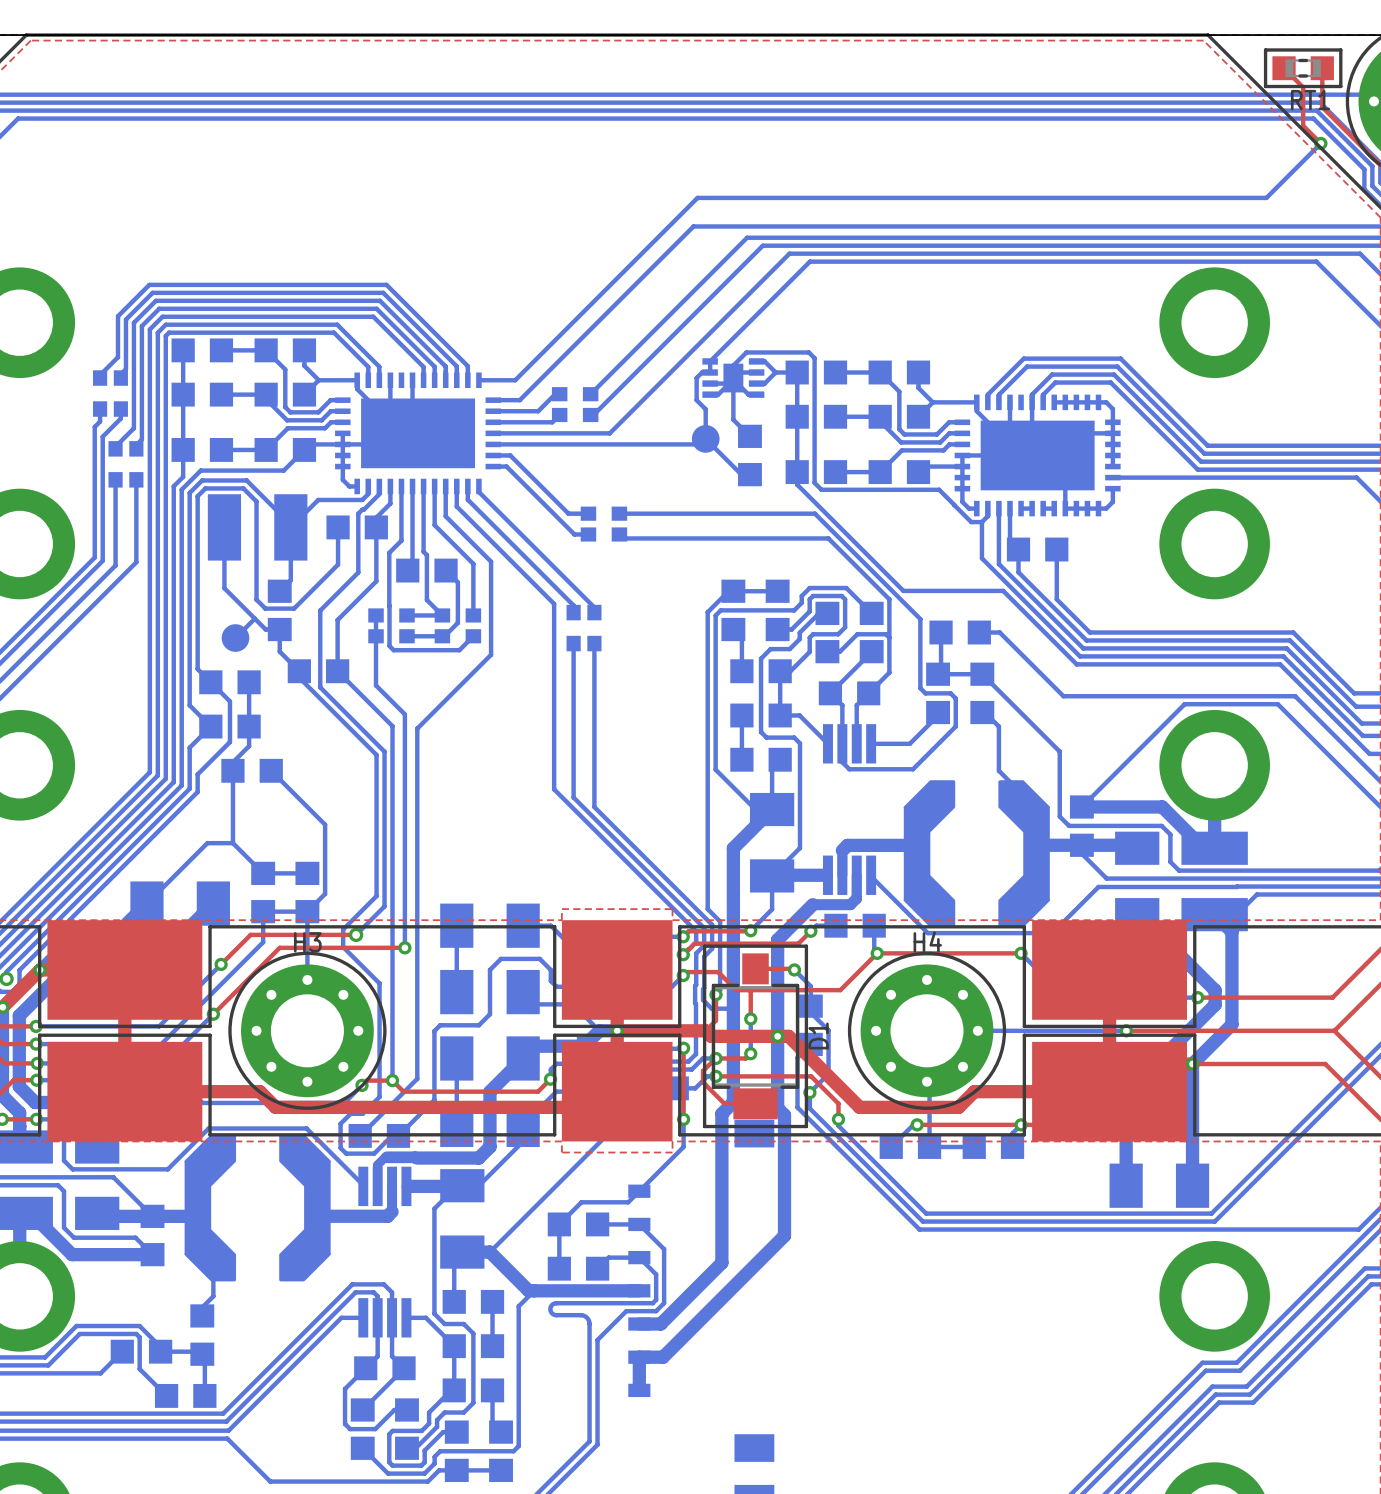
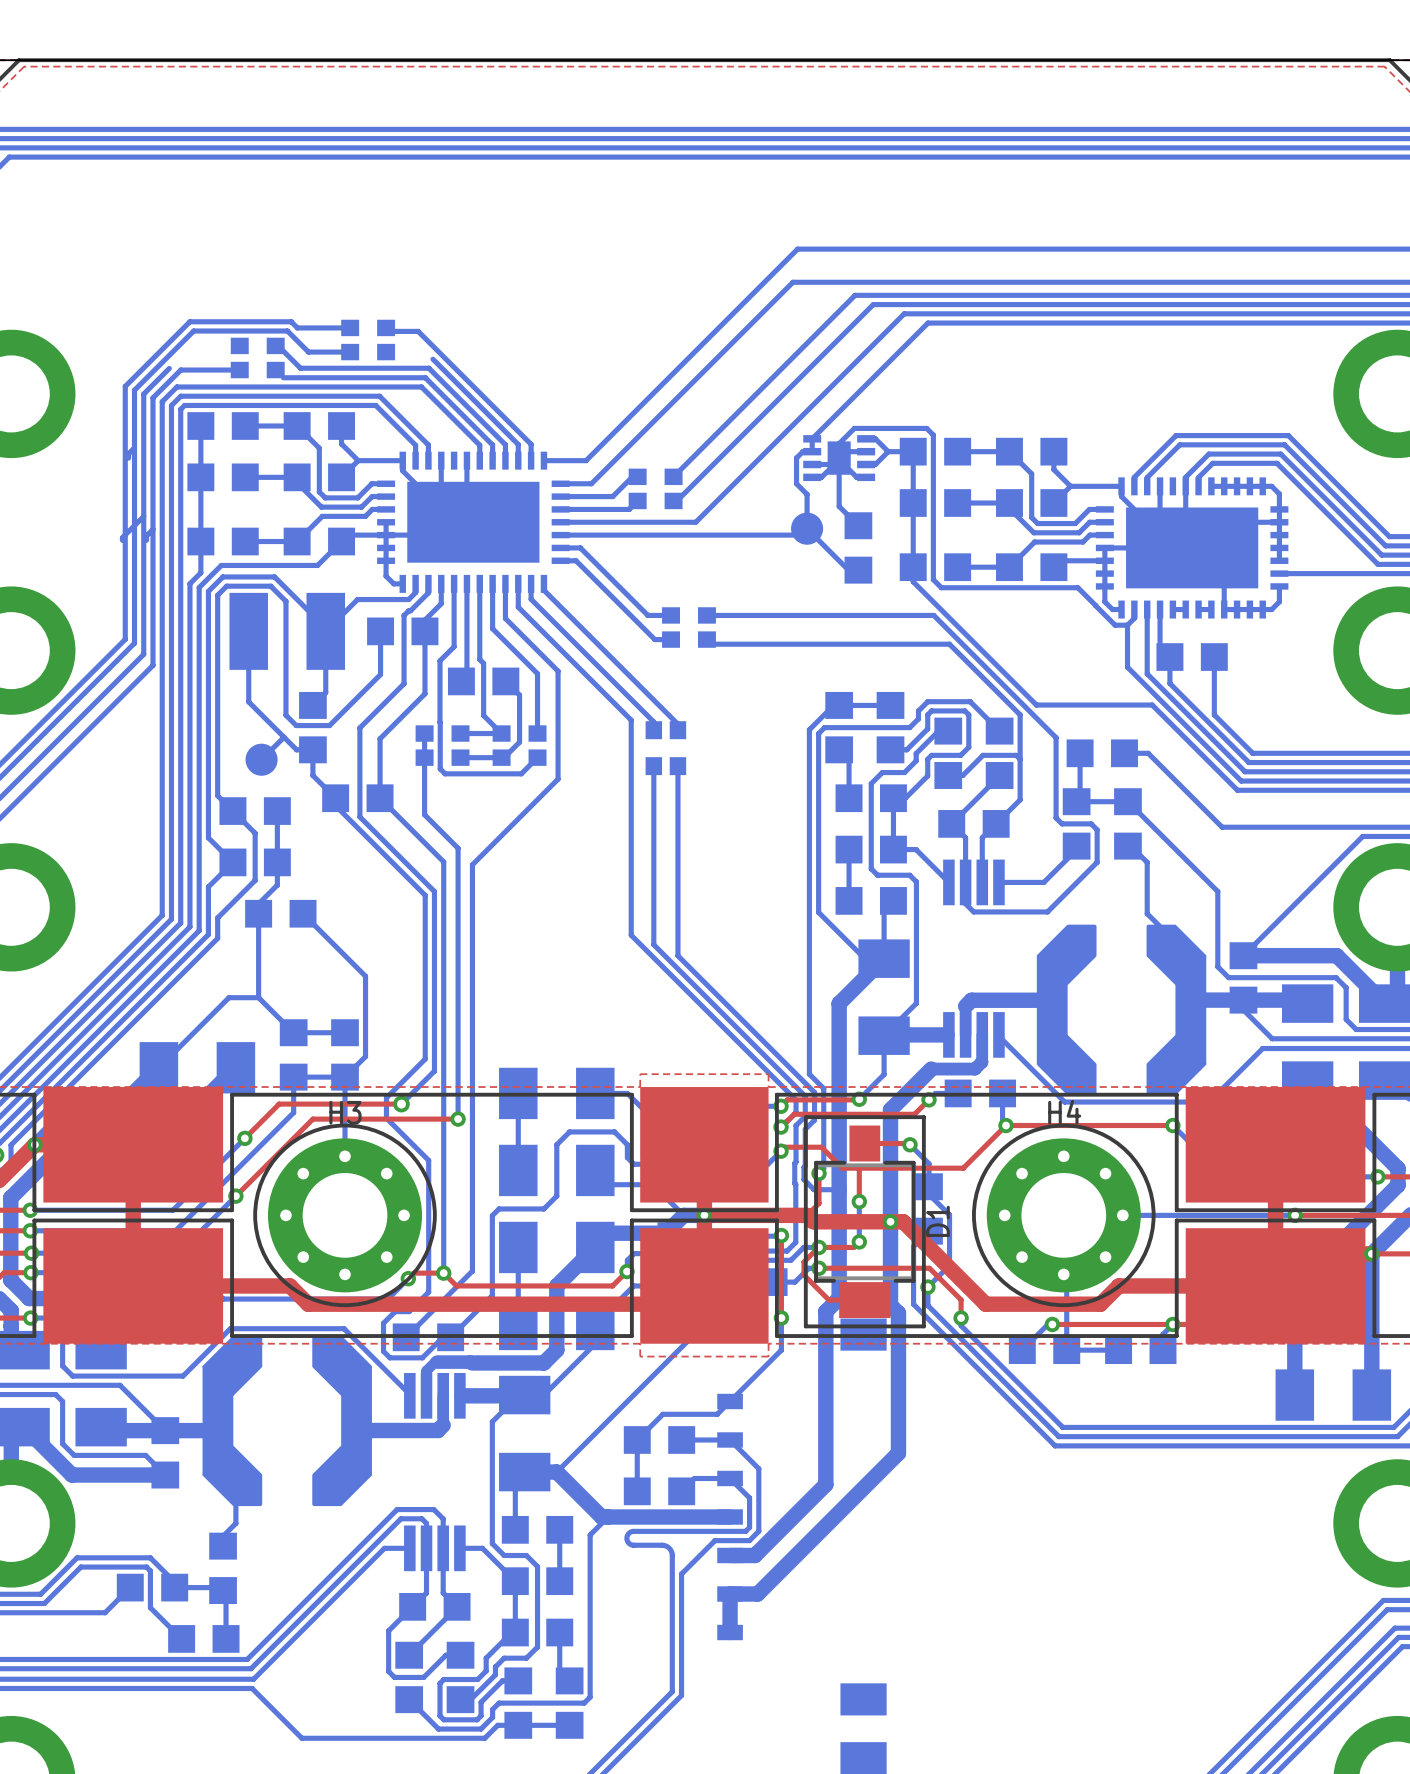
bottom track: none -> (386, 327) (389, 331) (418, 331) (436, 350)
part: none -> (368, 340)
bottom track: (149, 284) (386, 284) -> (161, 350) (189, 321) (291, 321) (297, 327) (350, 327)
part: none -> (257, 357)
bottom track: (152, 292) (383, 292) -> (165, 359) (193, 331) (287, 331) (308, 352) (350, 352)
bottom track: (155, 300) (379, 300) -> (275, 345) (278, 345) (300, 368) (428, 368)
bottom track: (159, 308) (254, 308) -> (173, 377) (180, 370) (239, 370)
bottom track: (118, 357) (100, 375) (100, 378) -> none
part: (110, 393) -> none
bottom track: (100, 409) (100, 421) (94, 426) (94, 557) -> (125, 433) (125, 639) (98, 666)
bottom track: (120, 409) (120, 418) (102, 436) (102, 560) -> (134, 447) (134, 643) (107, 670)
part: (125, 464) -> none
bottom track: (115, 479) (115, 565) -> (143, 516) (143, 654) (122, 675)
bottom track: (136, 479) (136, 562) -> (152, 529) (152, 665) (146, 671)

